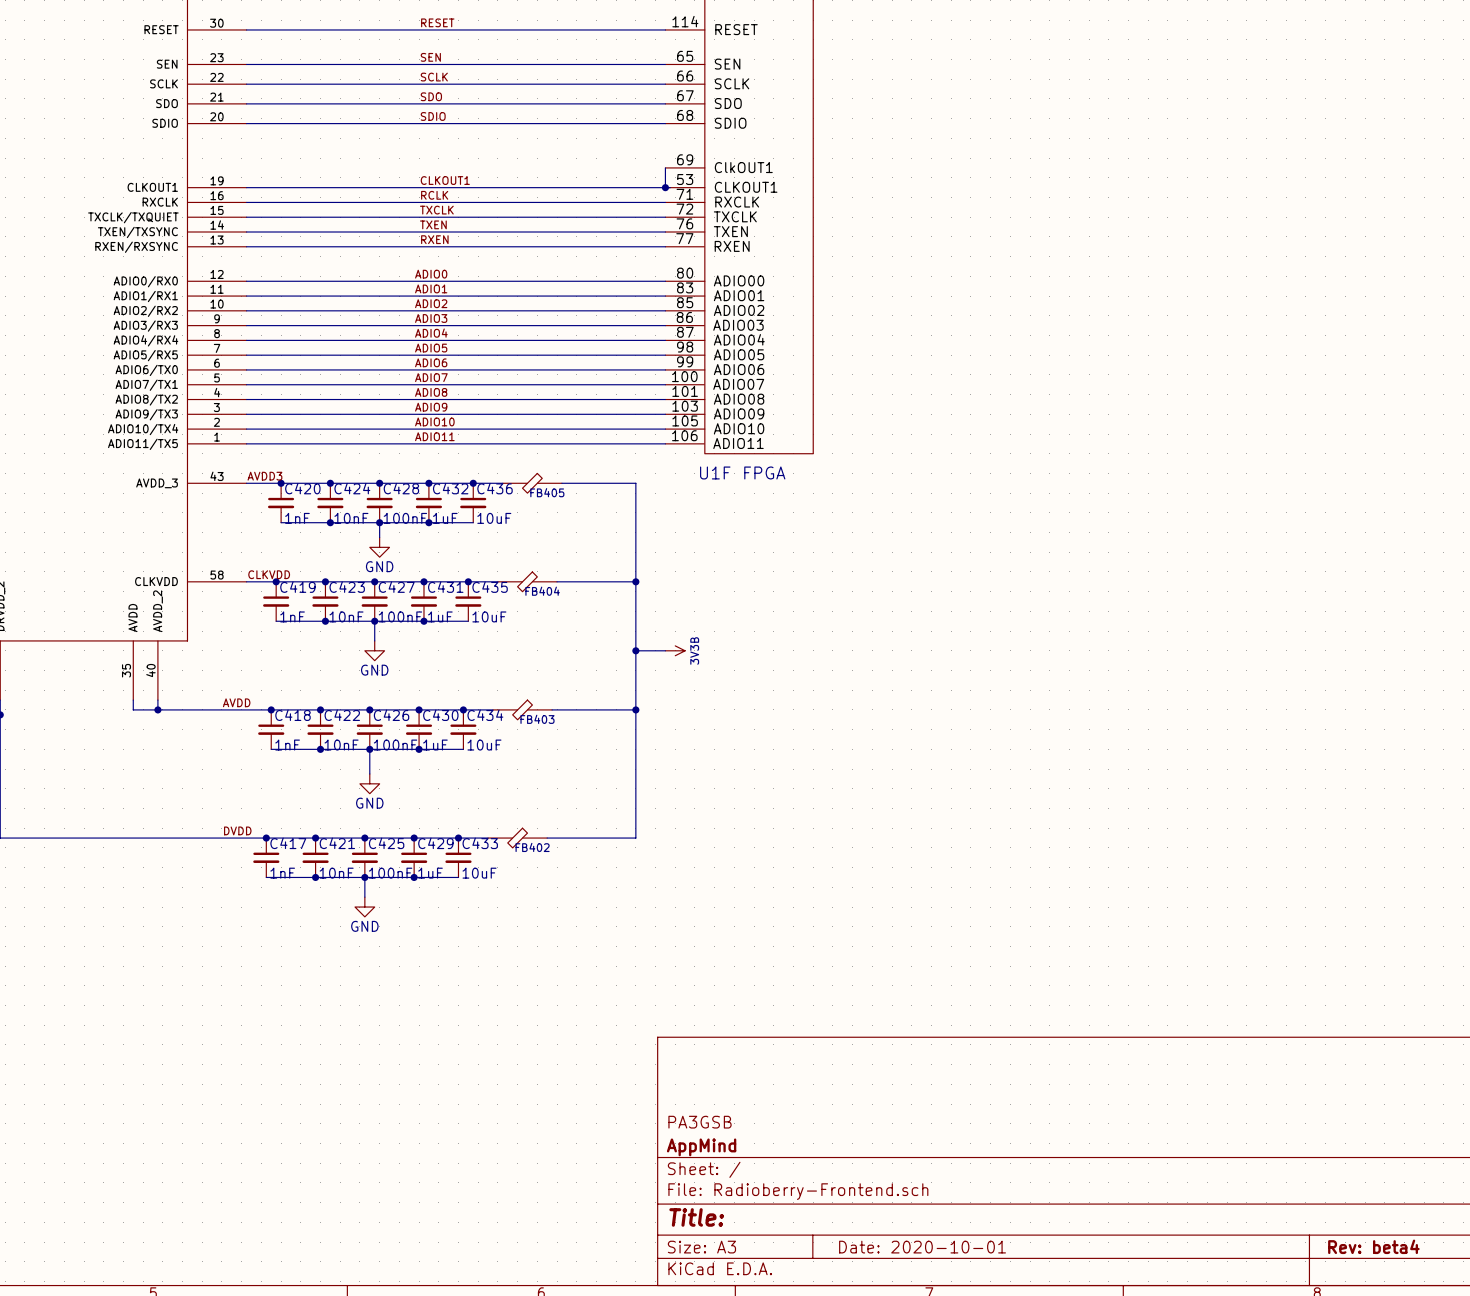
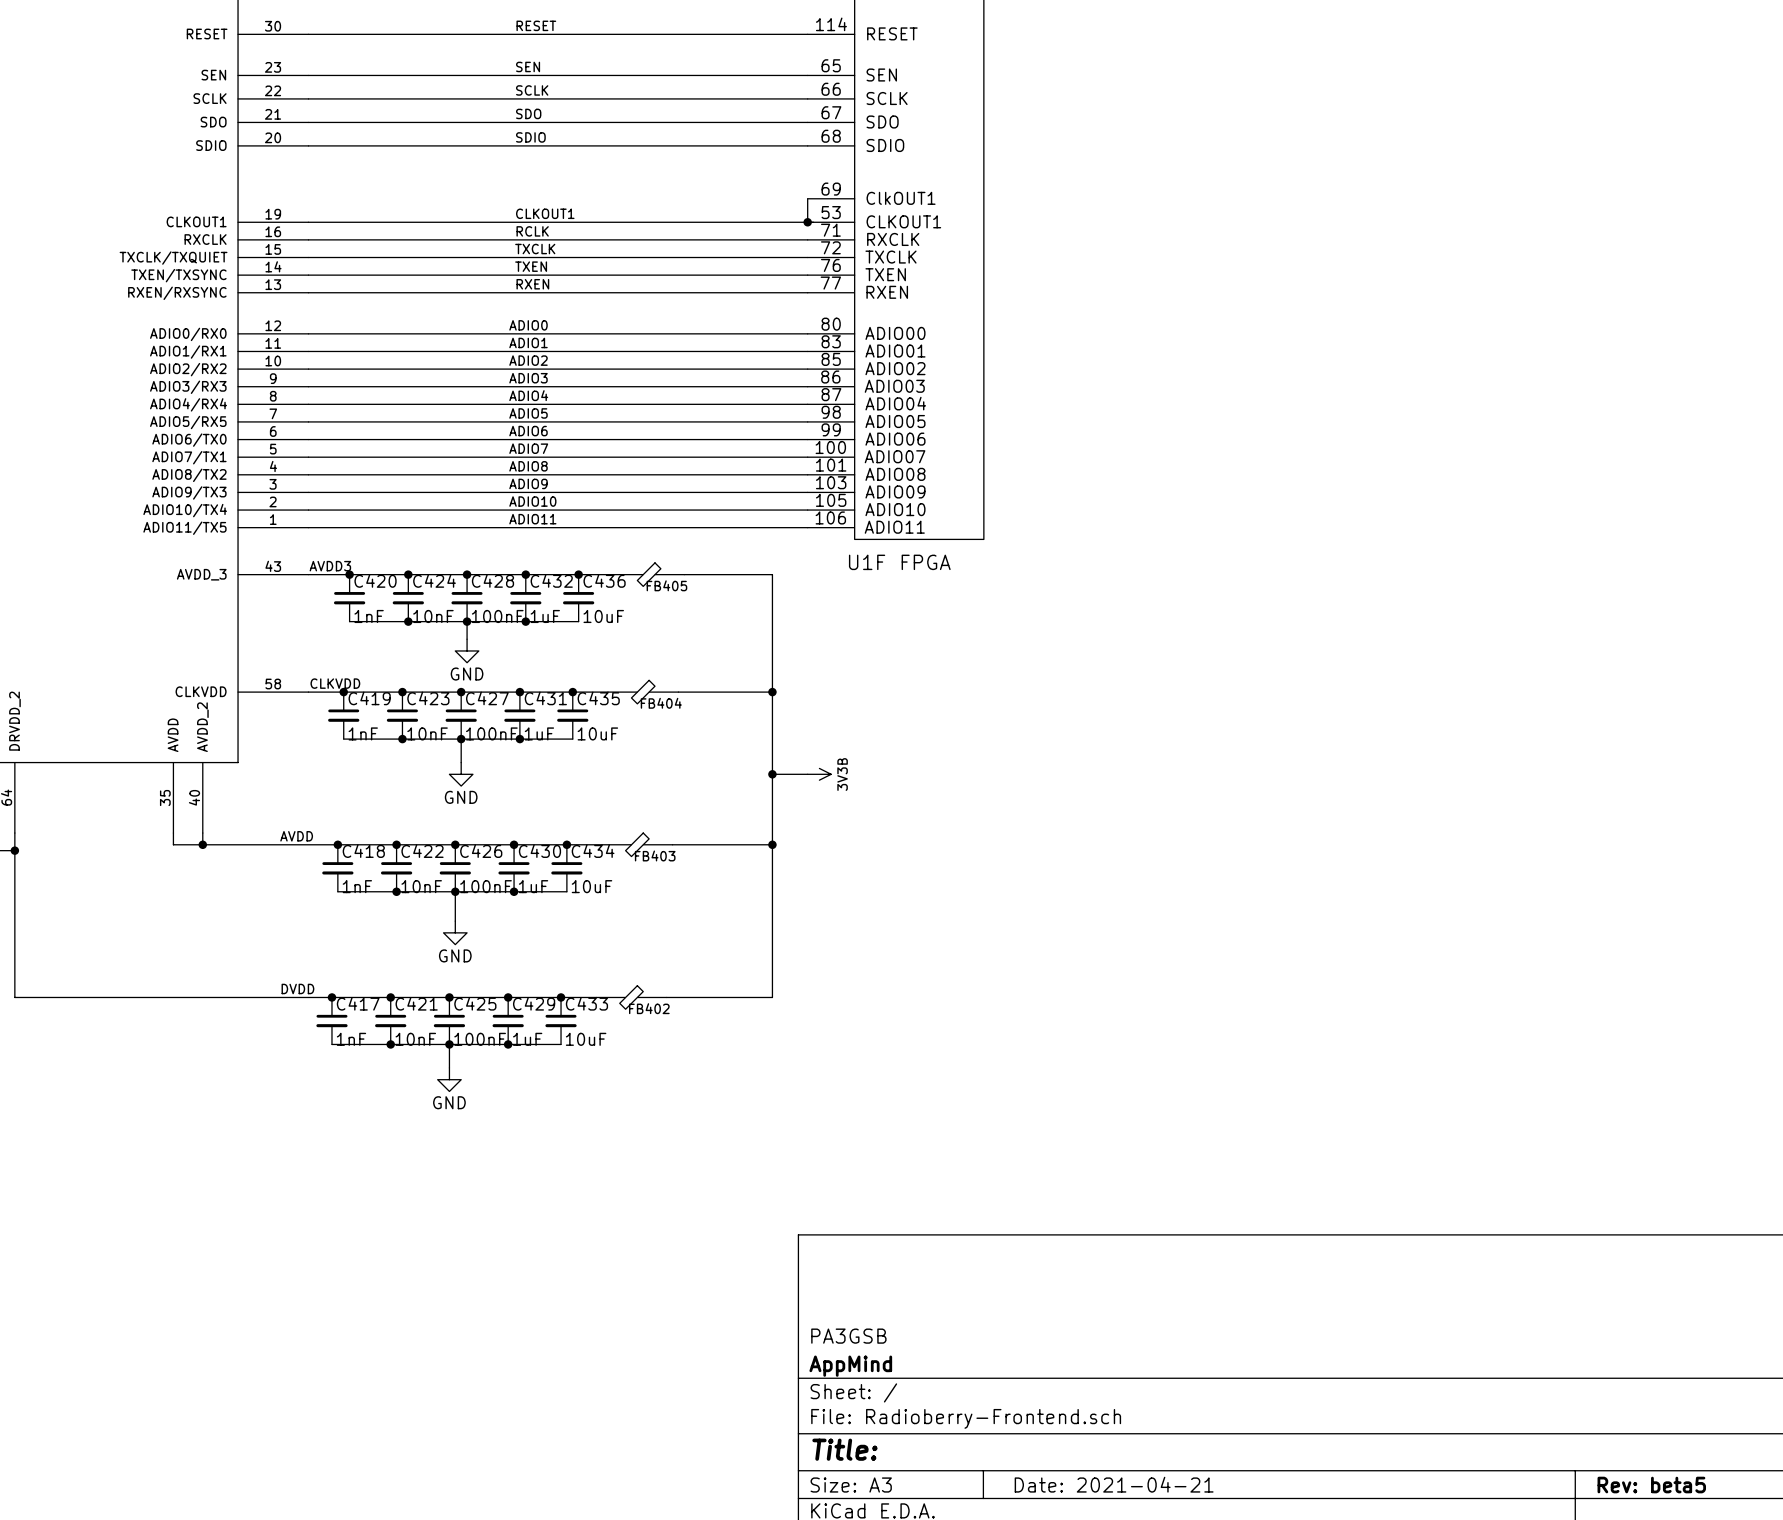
title block: Rev: beta4 (1373, 1246) -> Rev: beta5 (1651, 1485)
title block: Date: 2020-10-01 (922, 1247) -> Date: 2021-04-21 (1114, 1484)

